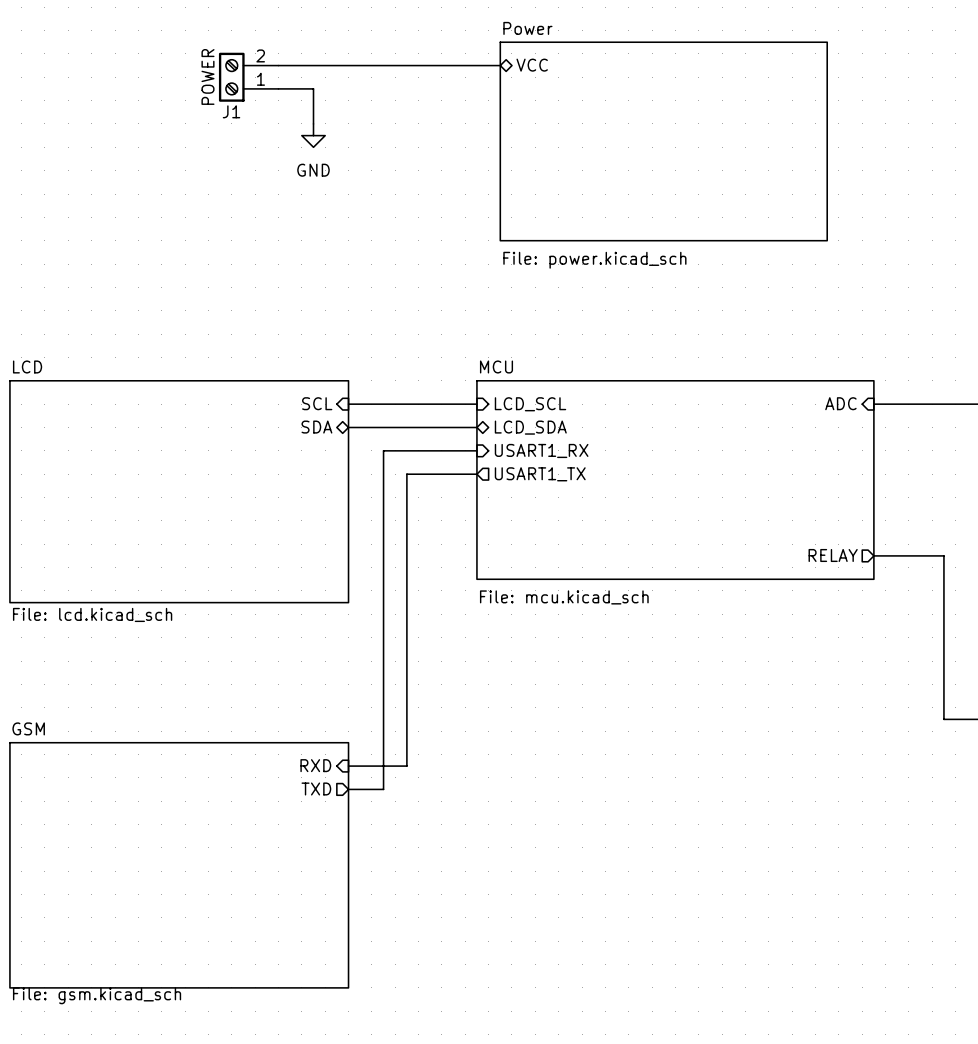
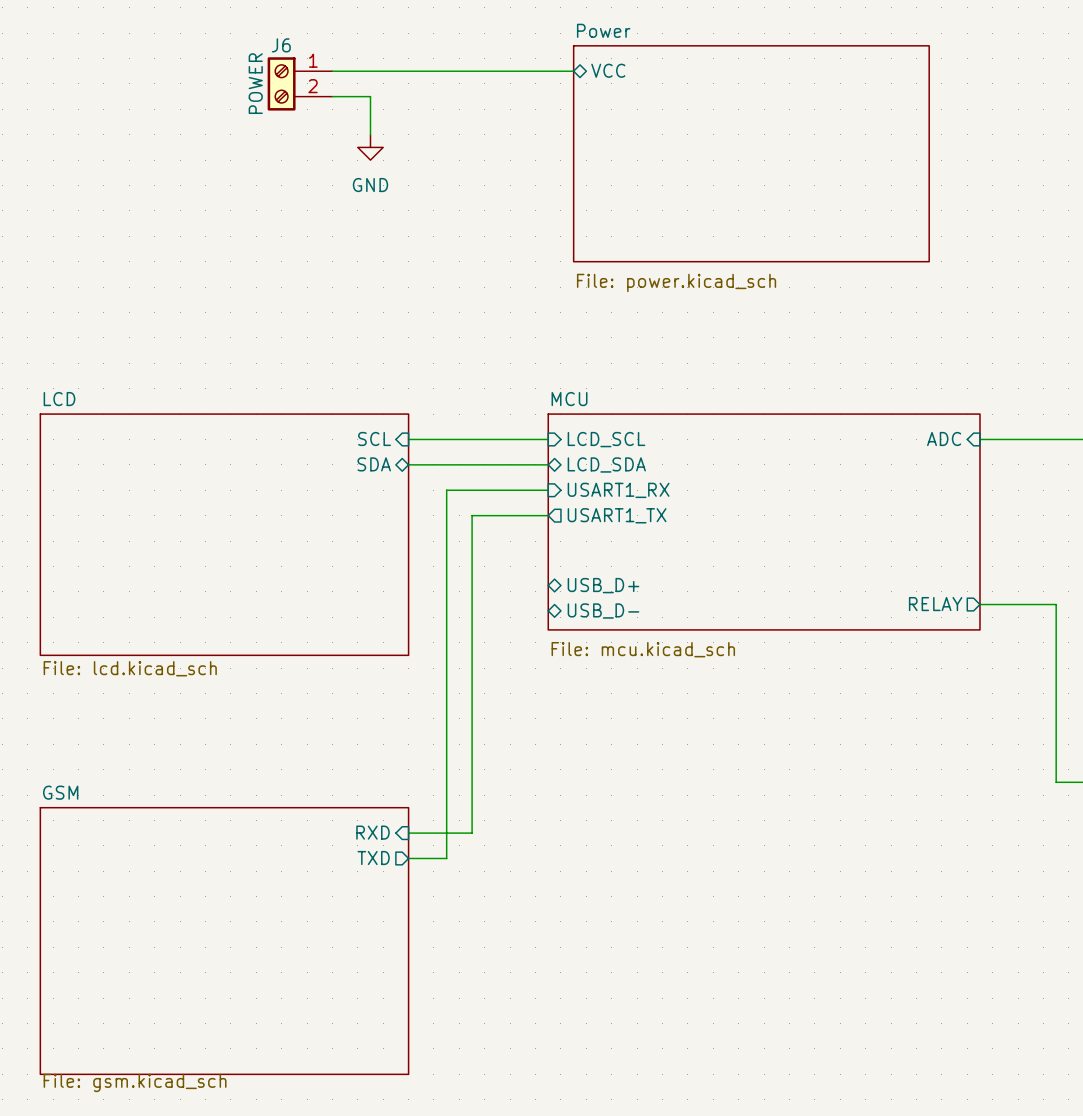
J1: POWER (248, 77) -> none
J6: none -> POWER (300, 83)
sheet pin: none -> USB_D+ (603, 585)
sheet pin: none -> USB_D- (603, 611)

